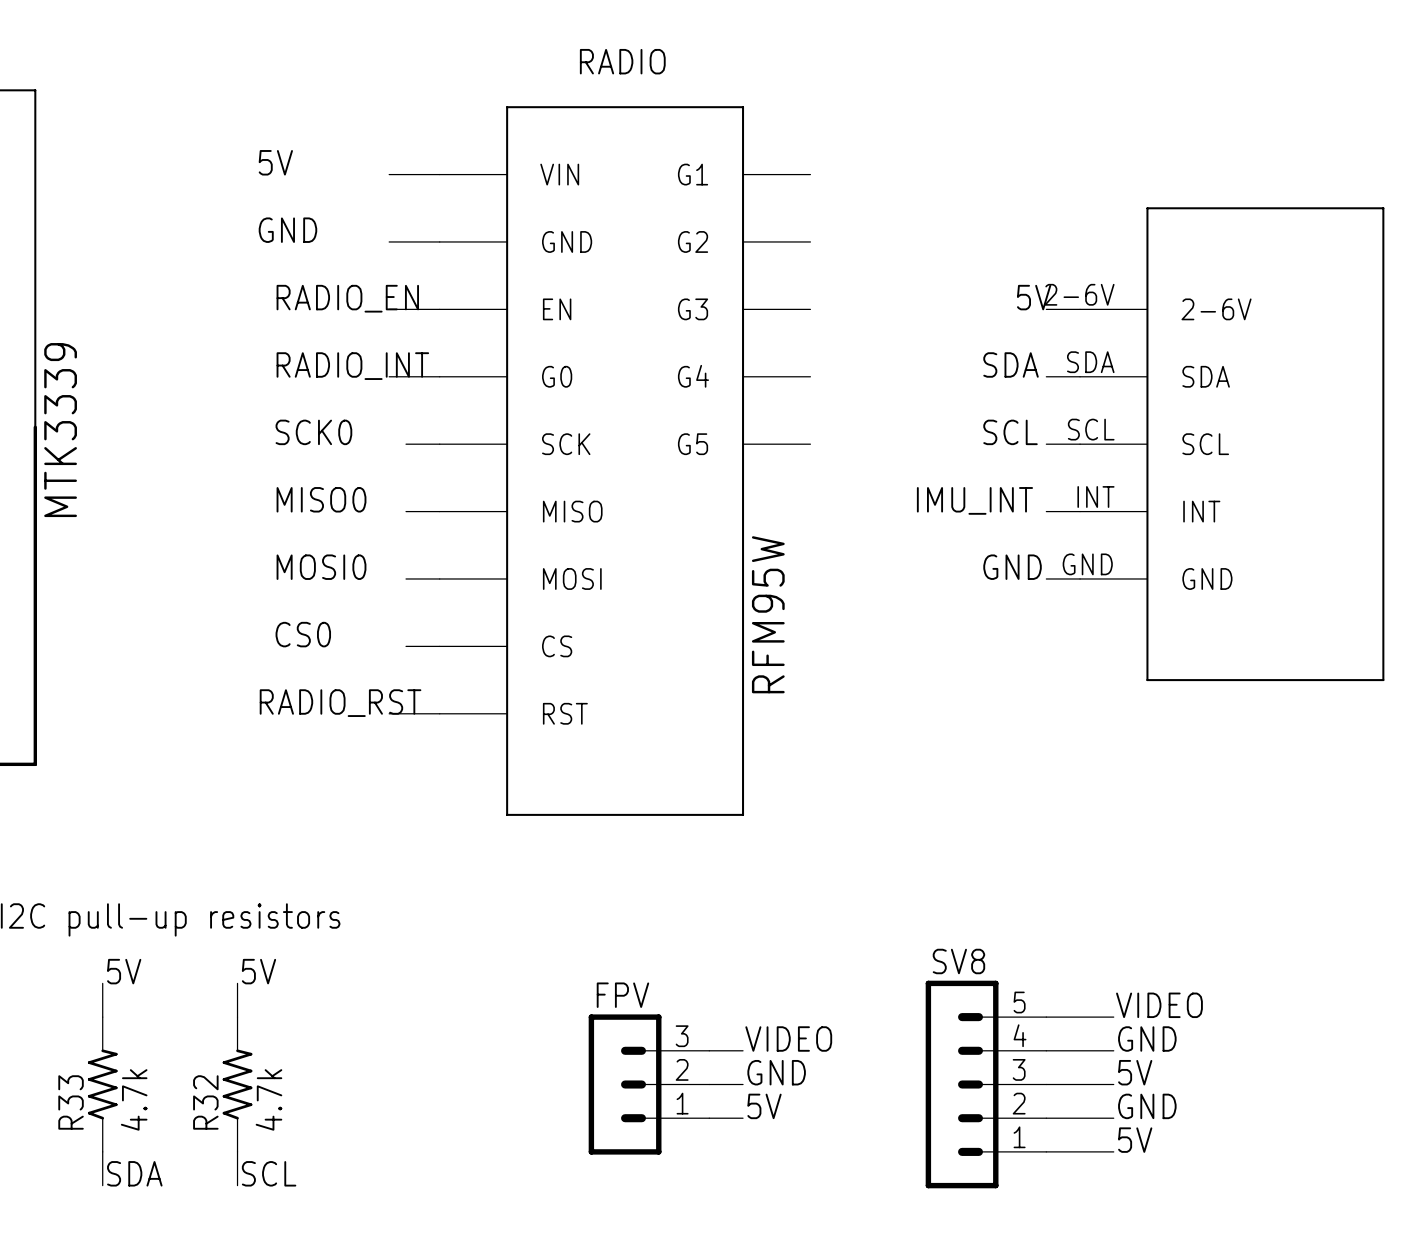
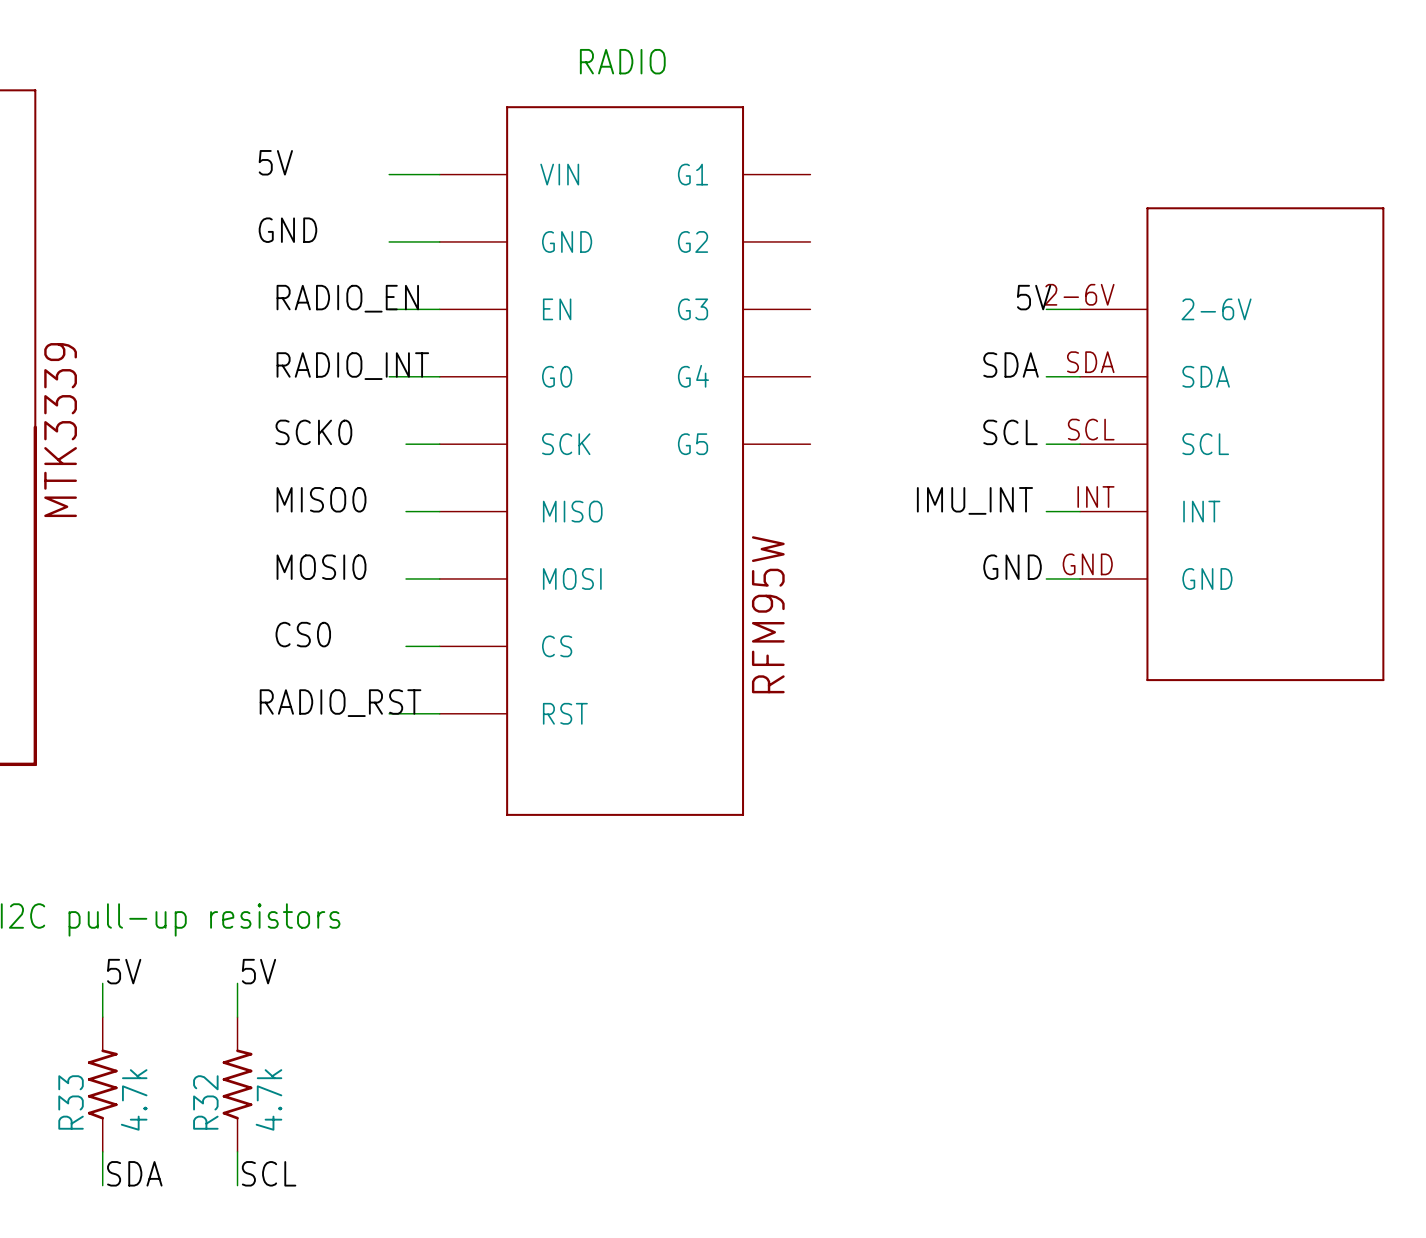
label: VIDEO (1159, 1005) -> none
wire: (1046, 1017) (1113, 1017) -> none
label: VIDEO (788, 1039) -> none
label: GND (1147, 1039) -> none
wire: (709, 1050) (743, 1050) -> none
wire: (1046, 1050) (1113, 1050) -> none
label: GND (776, 1072) -> none
label: 5V (1135, 1072) -> none
FPV: (649, 1084) -> none
wire: (709, 1084) (743, 1084) -> none
SV8: (986, 1084) -> none
wire: (1046, 1084) (1113, 1084) -> none
label: 5V (764, 1106) -> none
label: GND (1147, 1106) -> none
wire: (709, 1118) (743, 1118) -> none
wire: (1046, 1118) (1113, 1118) -> none
label: 5V (1135, 1140) -> none
wire: (1046, 1151) (1113, 1151) -> none

